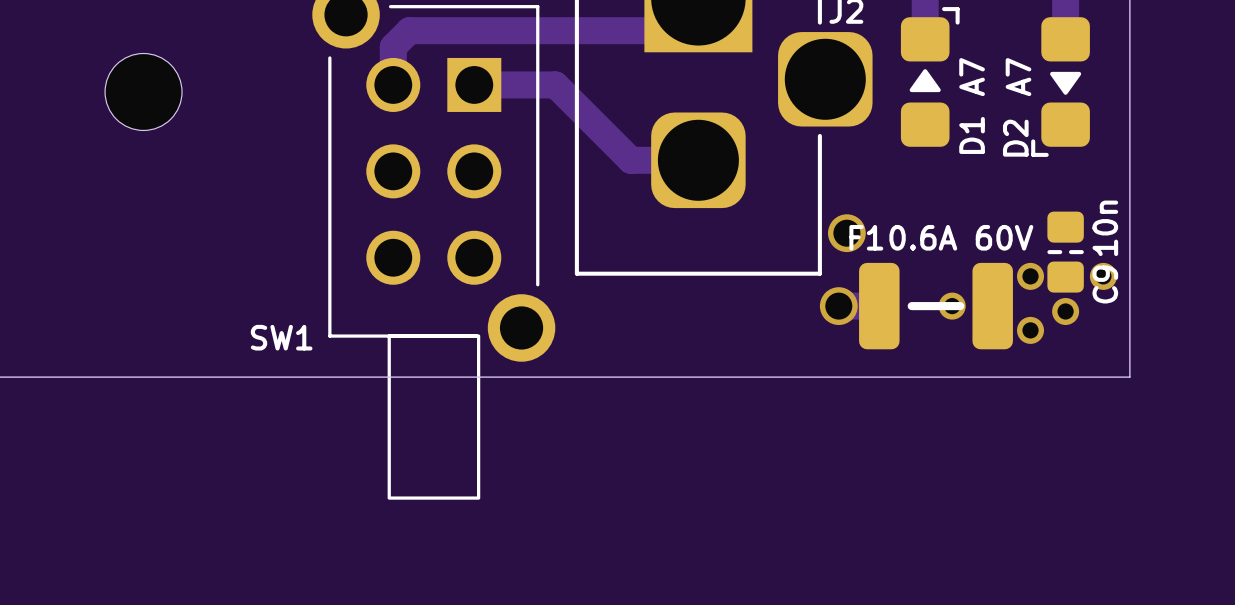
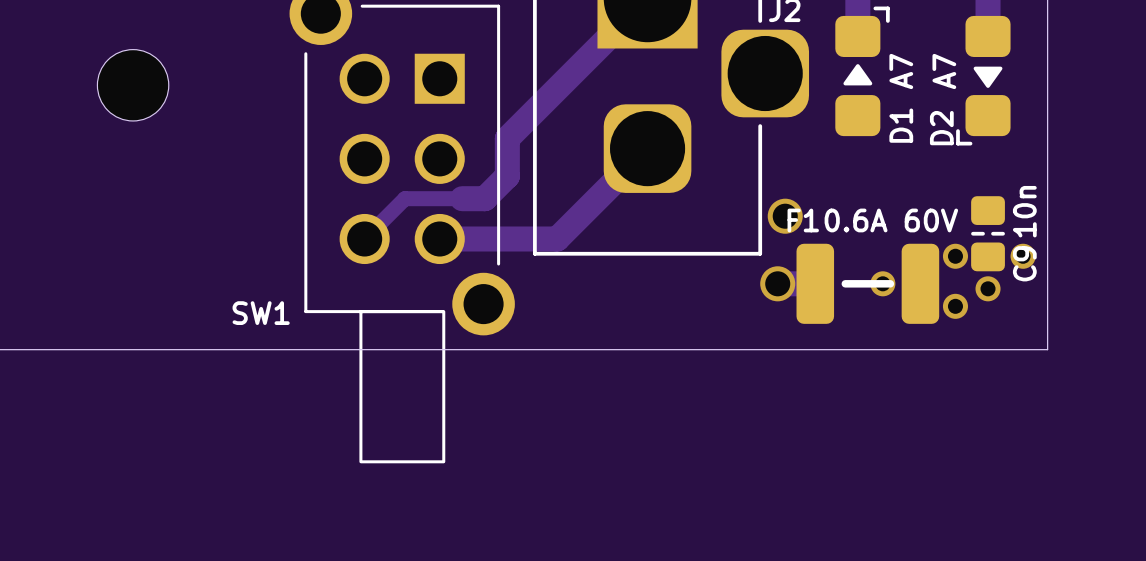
track: (666, 30) (409, 30) (393, 46) (393, 84) -> (617, 28) (507, 138) (507, 176) (484, 198) (404, 198) (364, 238)
track: (474, 84) (555, 84) (630, 160) (698, 160) -> (439, 238) (557, 238) (647, 148)

